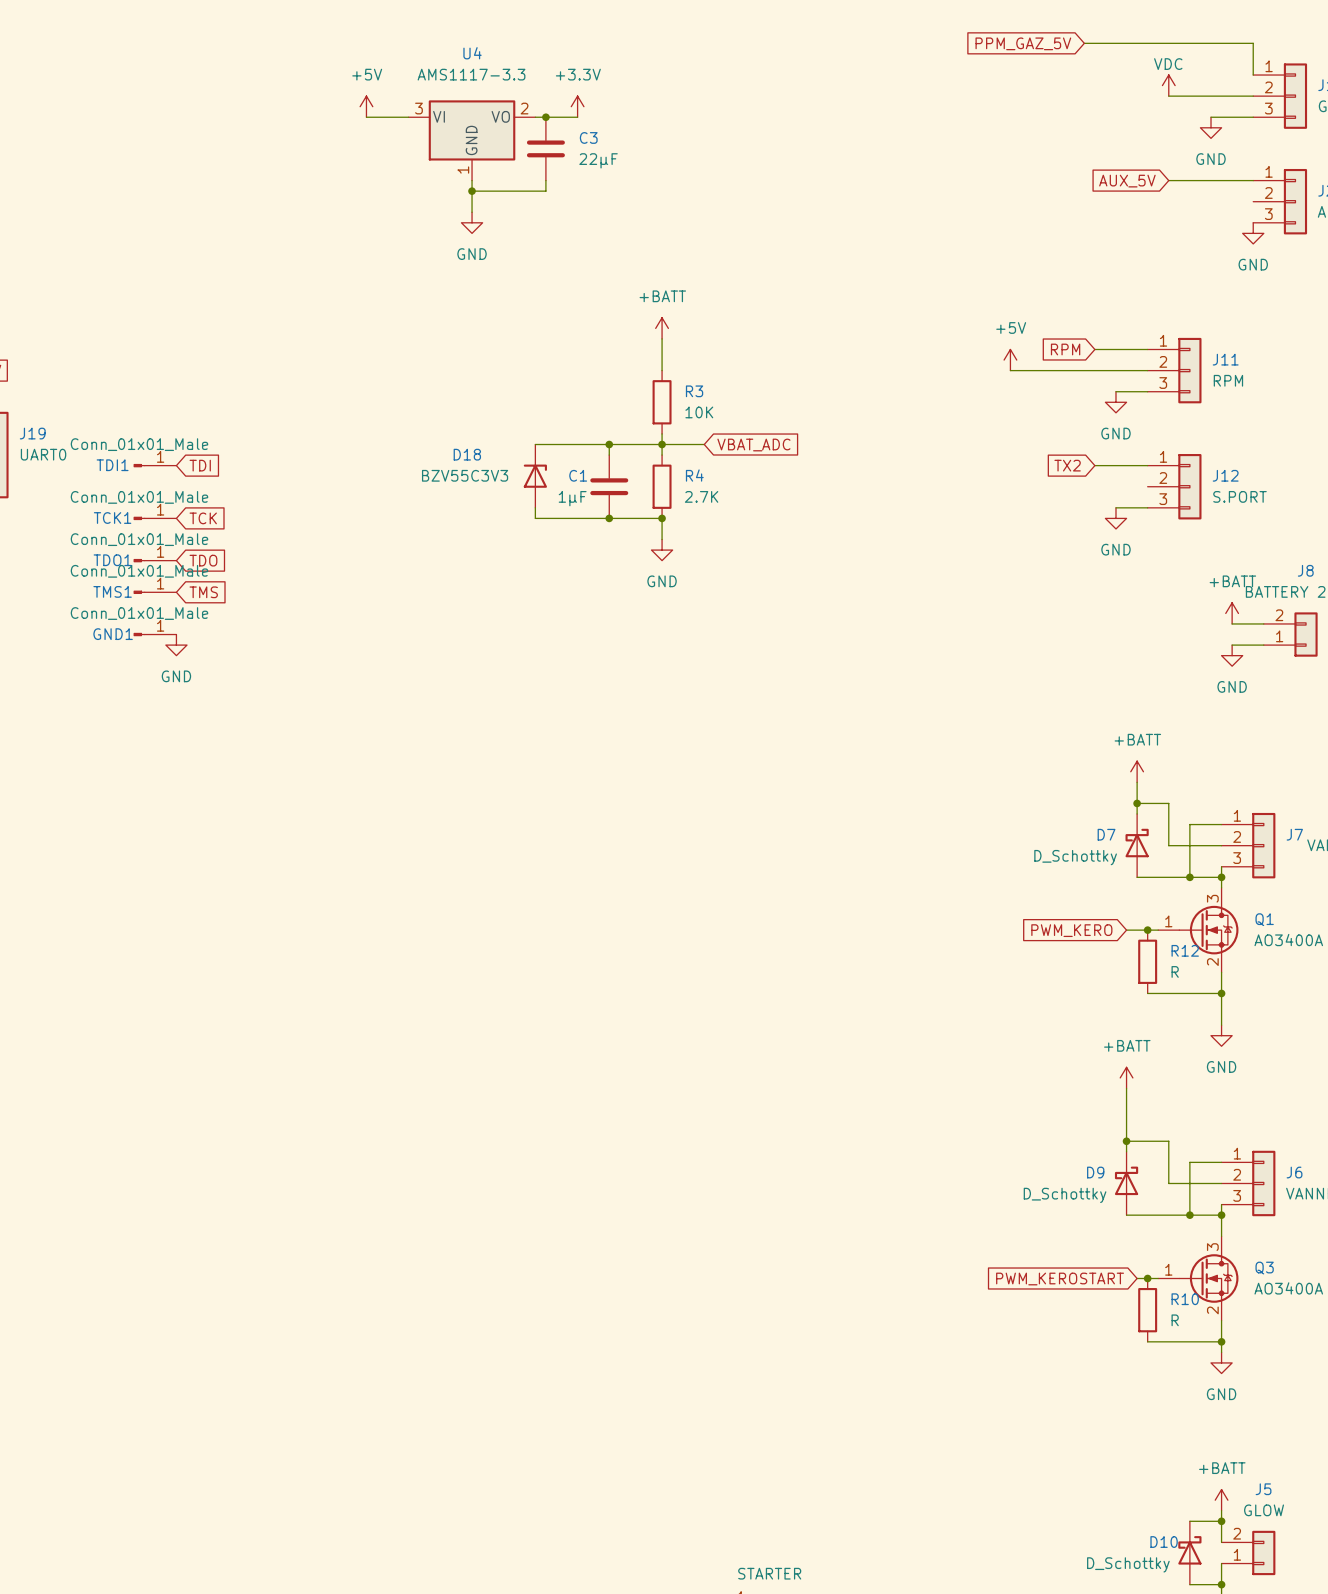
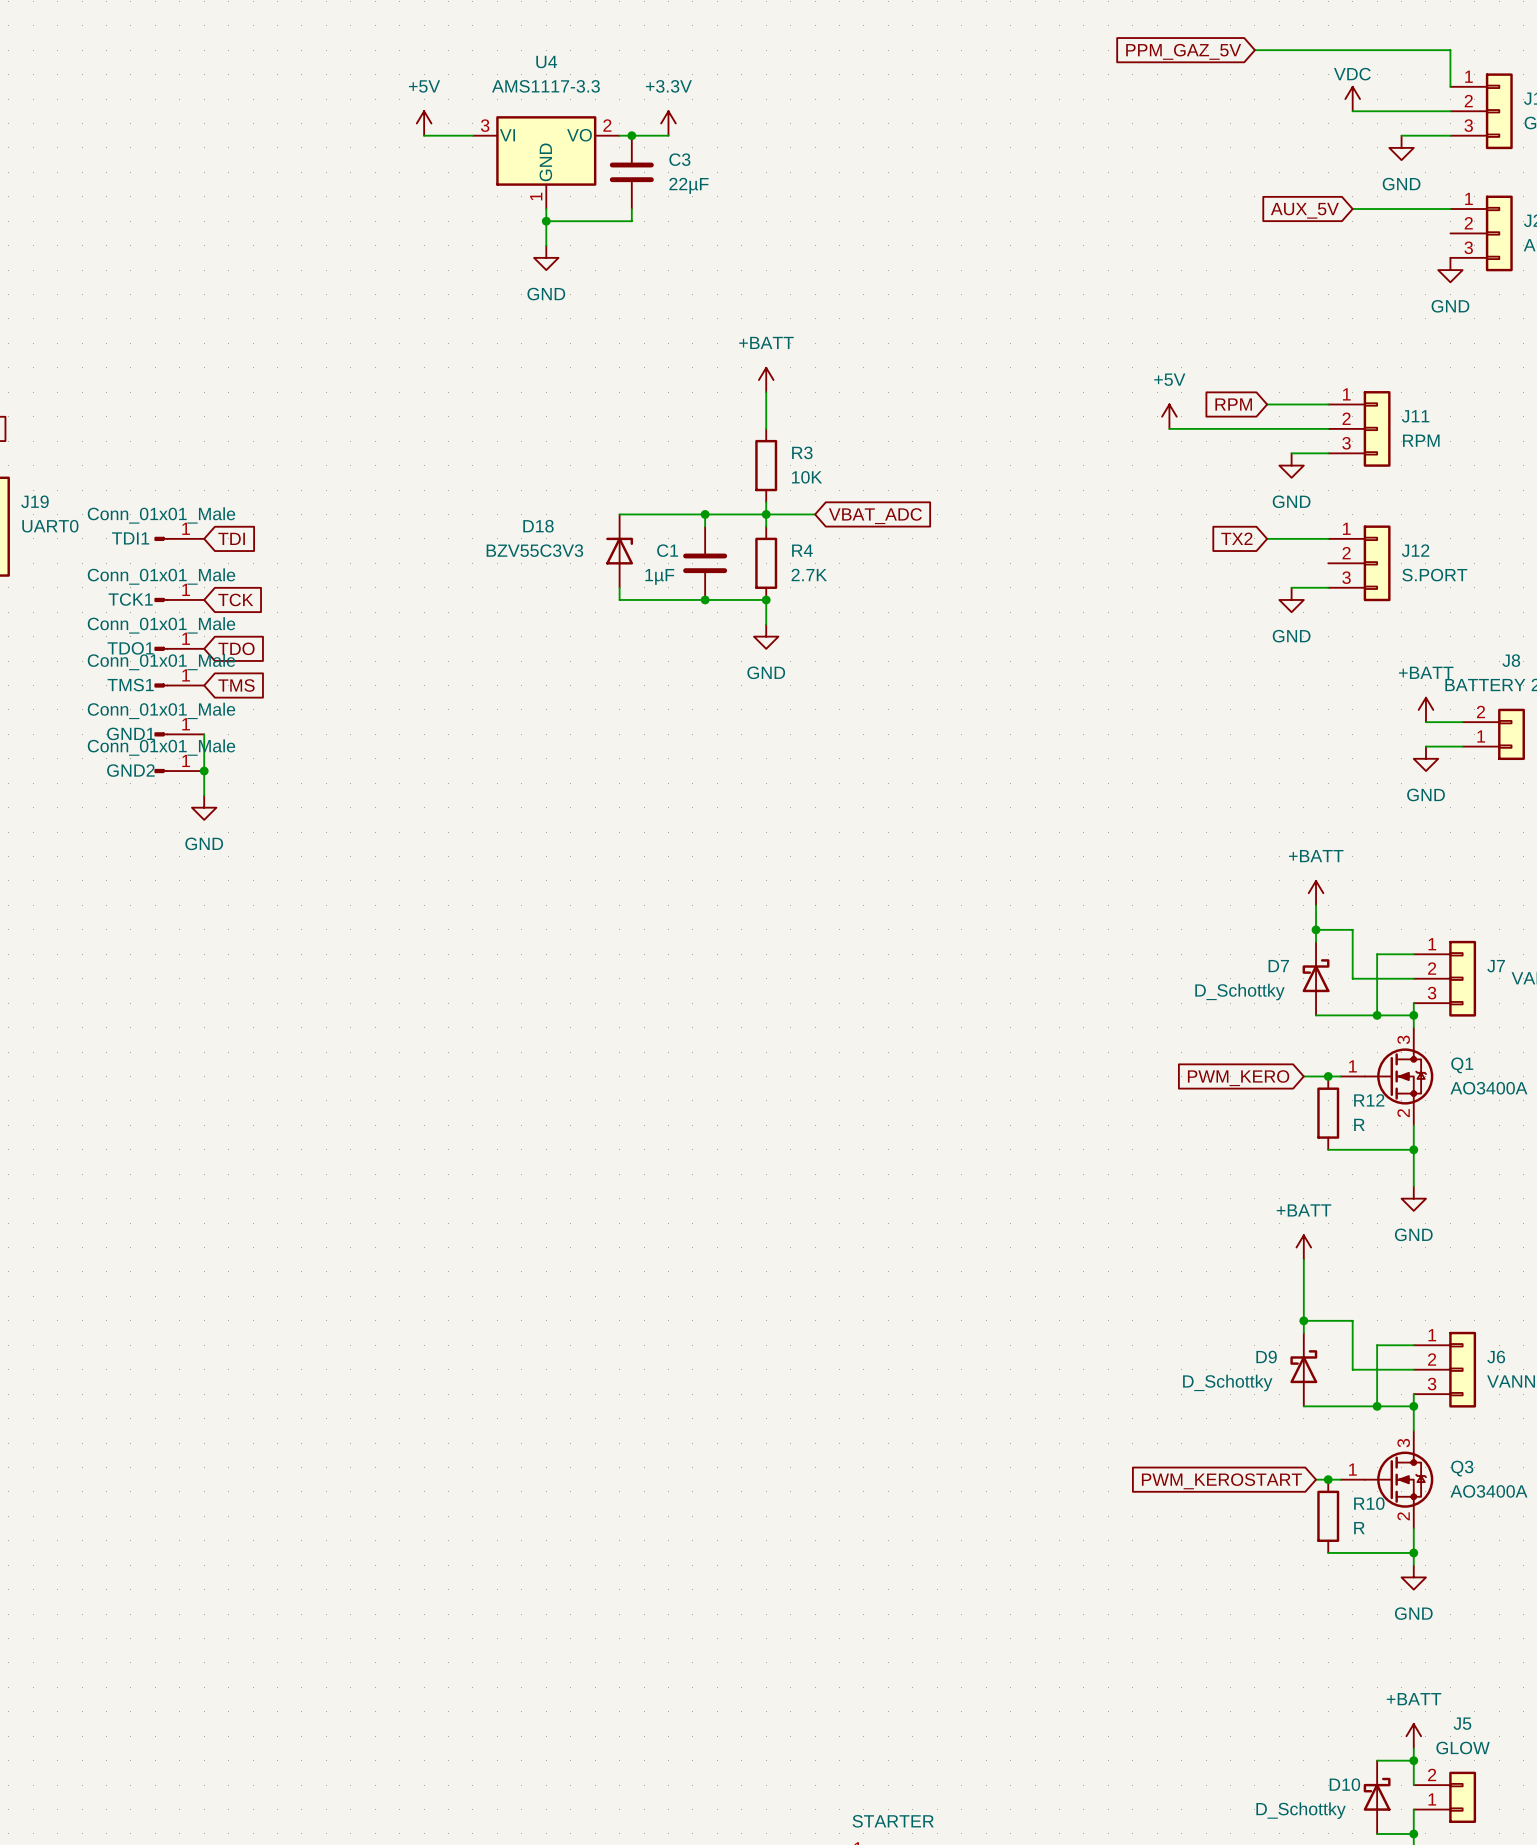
wire: none -> (204, 734) (204, 795)
power symbol position: GND (176, 645) -> GND (204, 807)
GND2: none -> Conn_01x01_Male (179, 771)
junction: none -> (204, 771)

